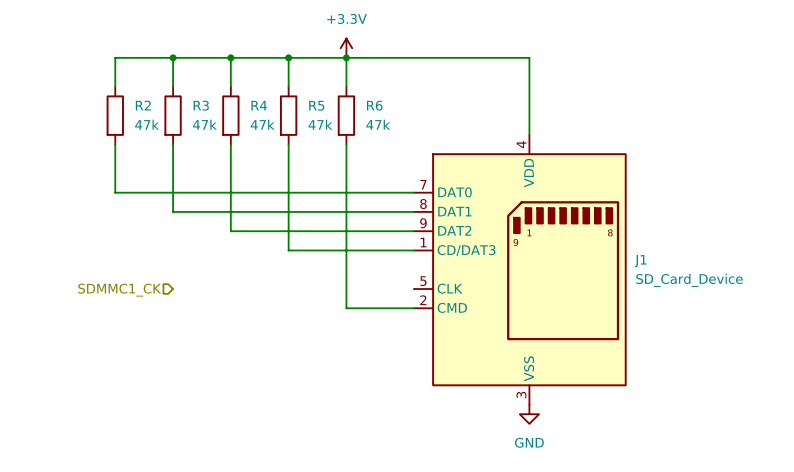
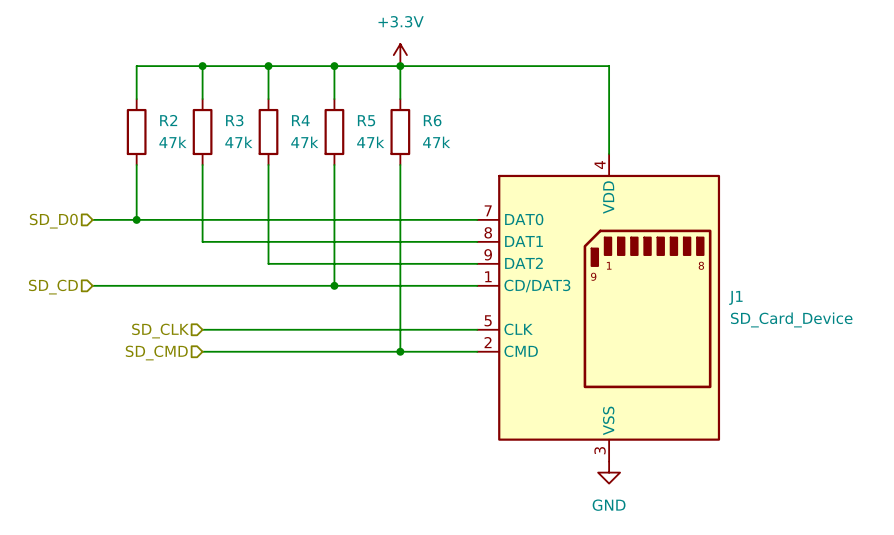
wire: none -> (92, 219) (136, 219)
junction: none -> (136, 219)
hierarchical label: none -> SD_D0 (53, 221)
wire: none -> (92, 285) (334, 285)
junction: none -> (334, 285)
hierarchical label: none -> SD_CD (53, 287)
wire: none -> (202, 329) (477, 329)
hierarchical label: SDMMC1_CK (119, 290) -> SD_CLK (160, 331)
wire: none -> (202, 351) (400, 351)
junction: none -> (400, 351)
hierarchical label: none -> SD_CMD (156, 353)

